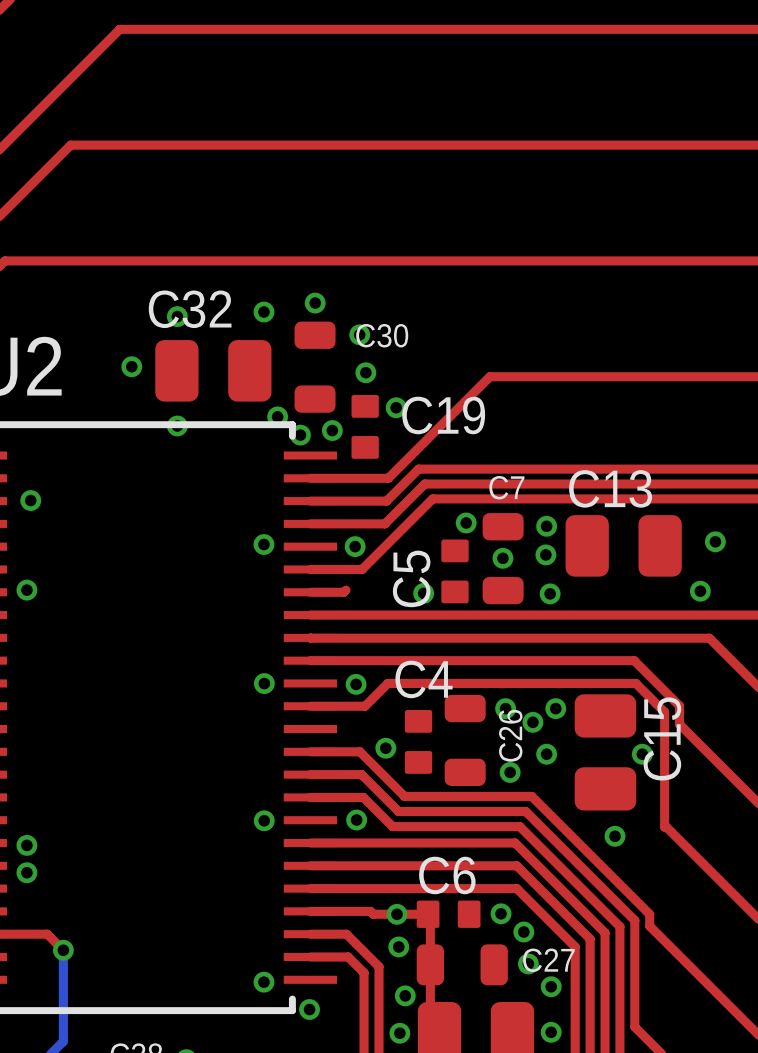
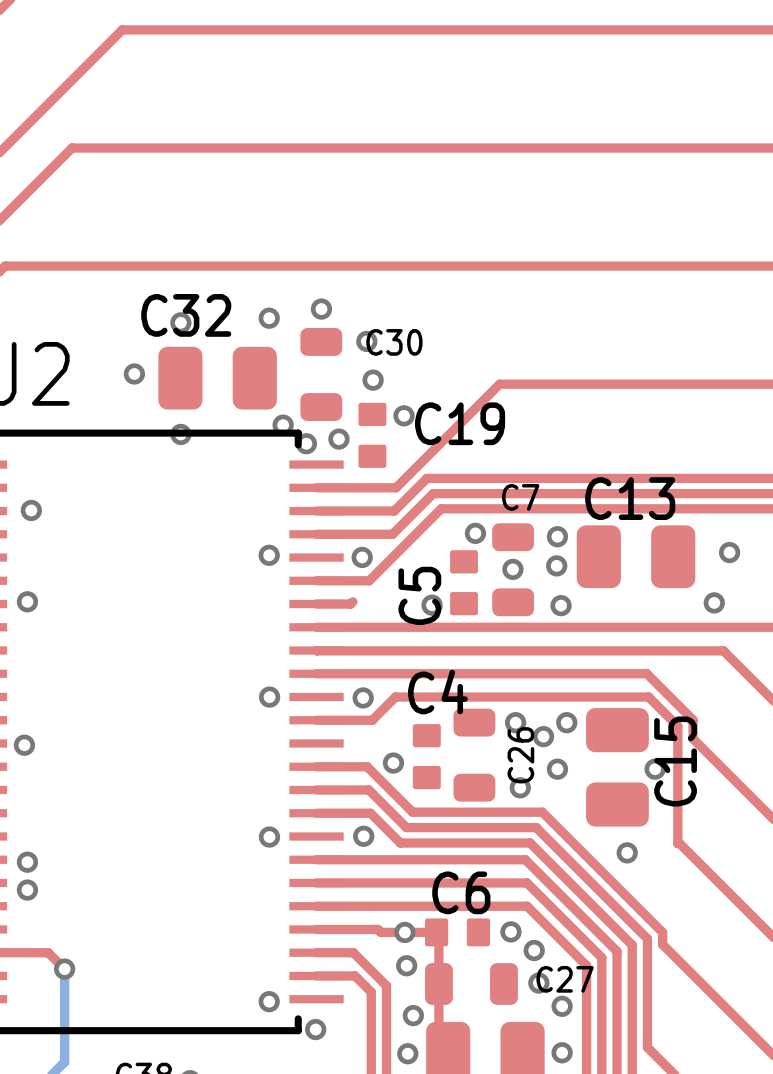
via: none -> (24, 745)

